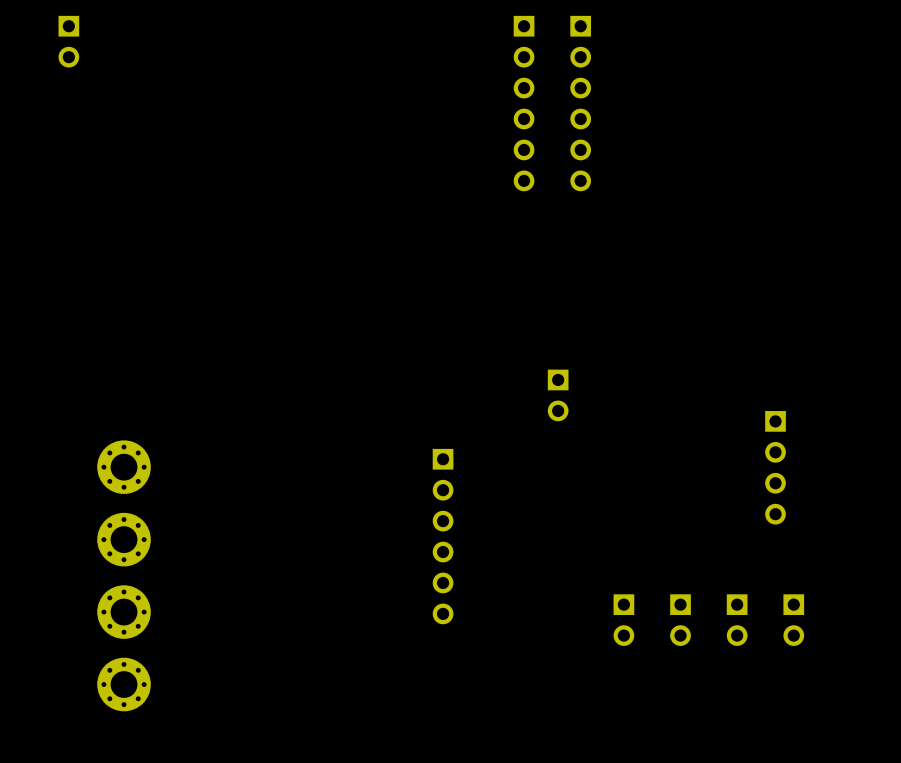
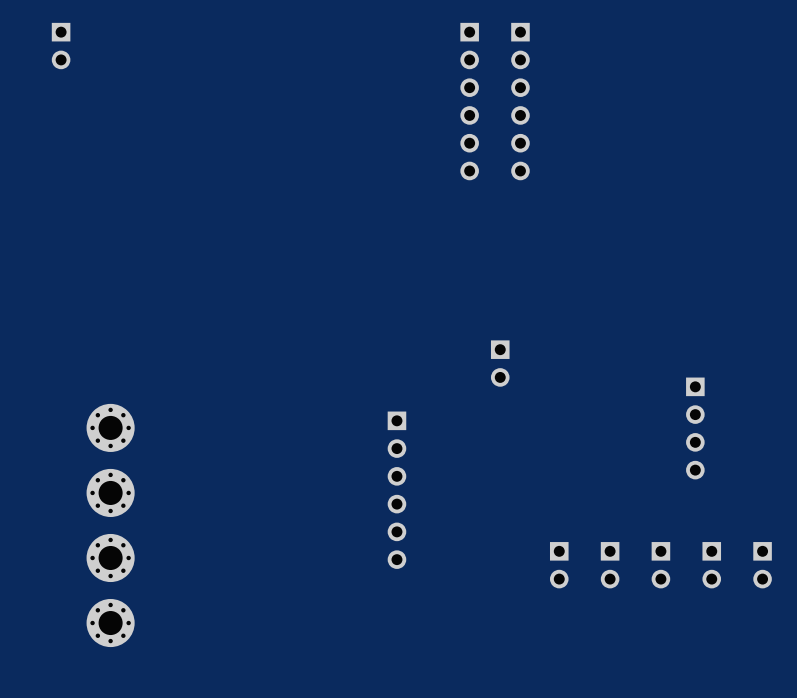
part: none -> (762, 565)

